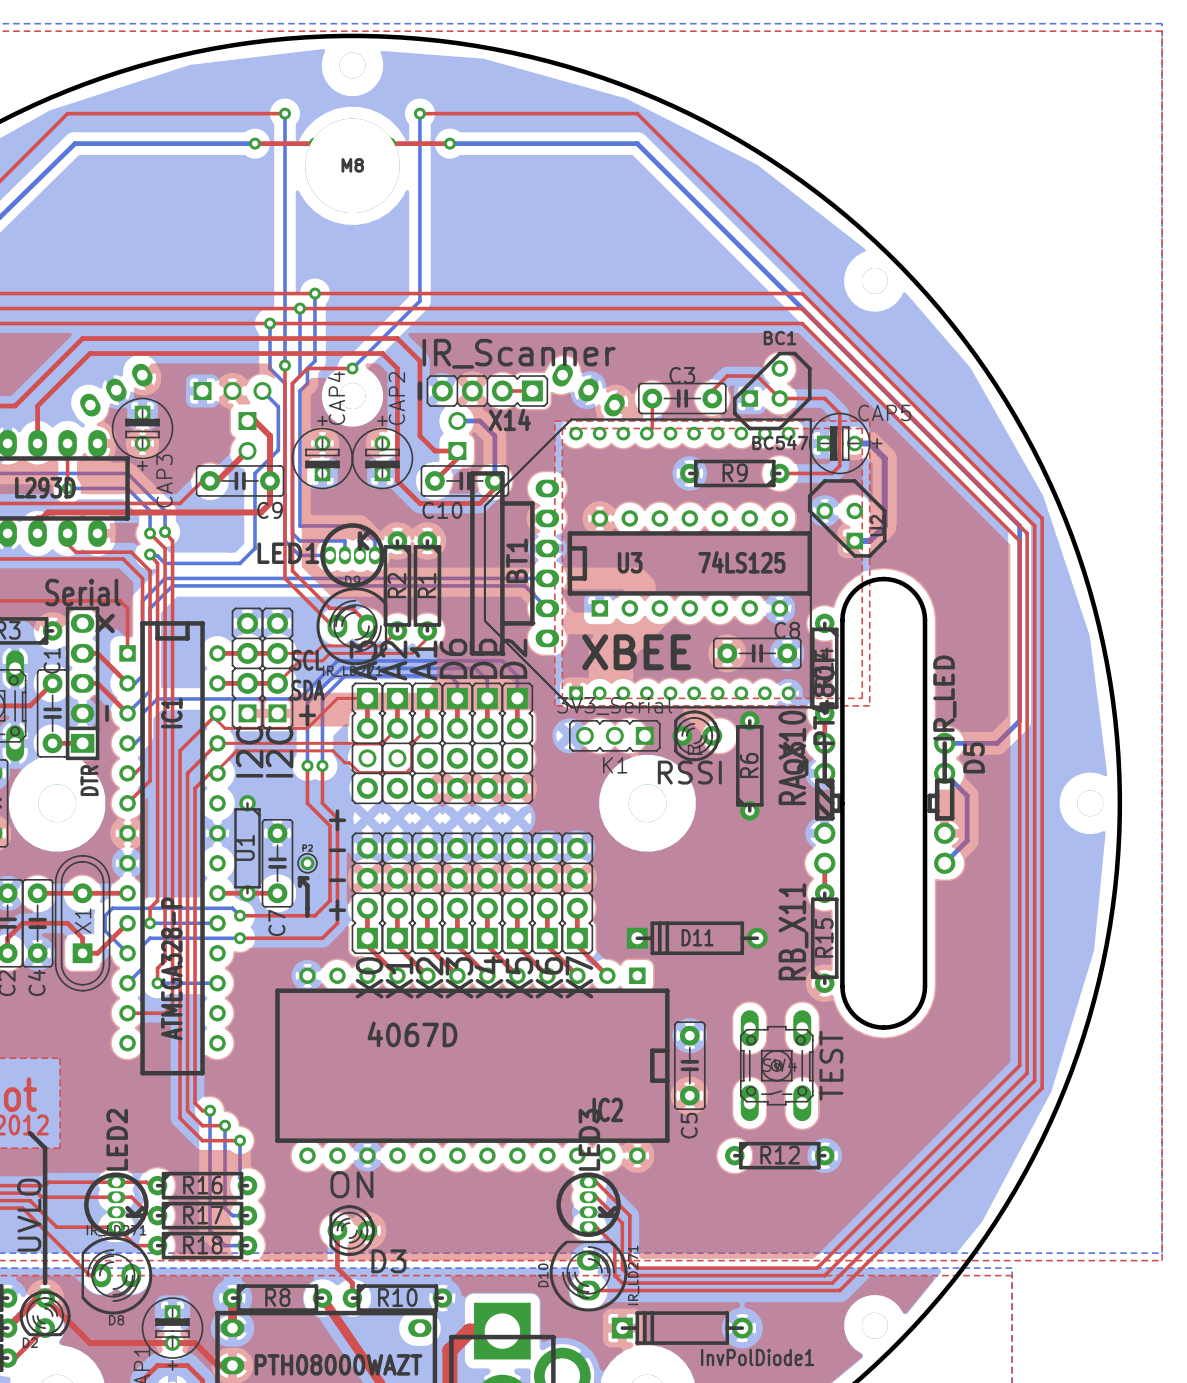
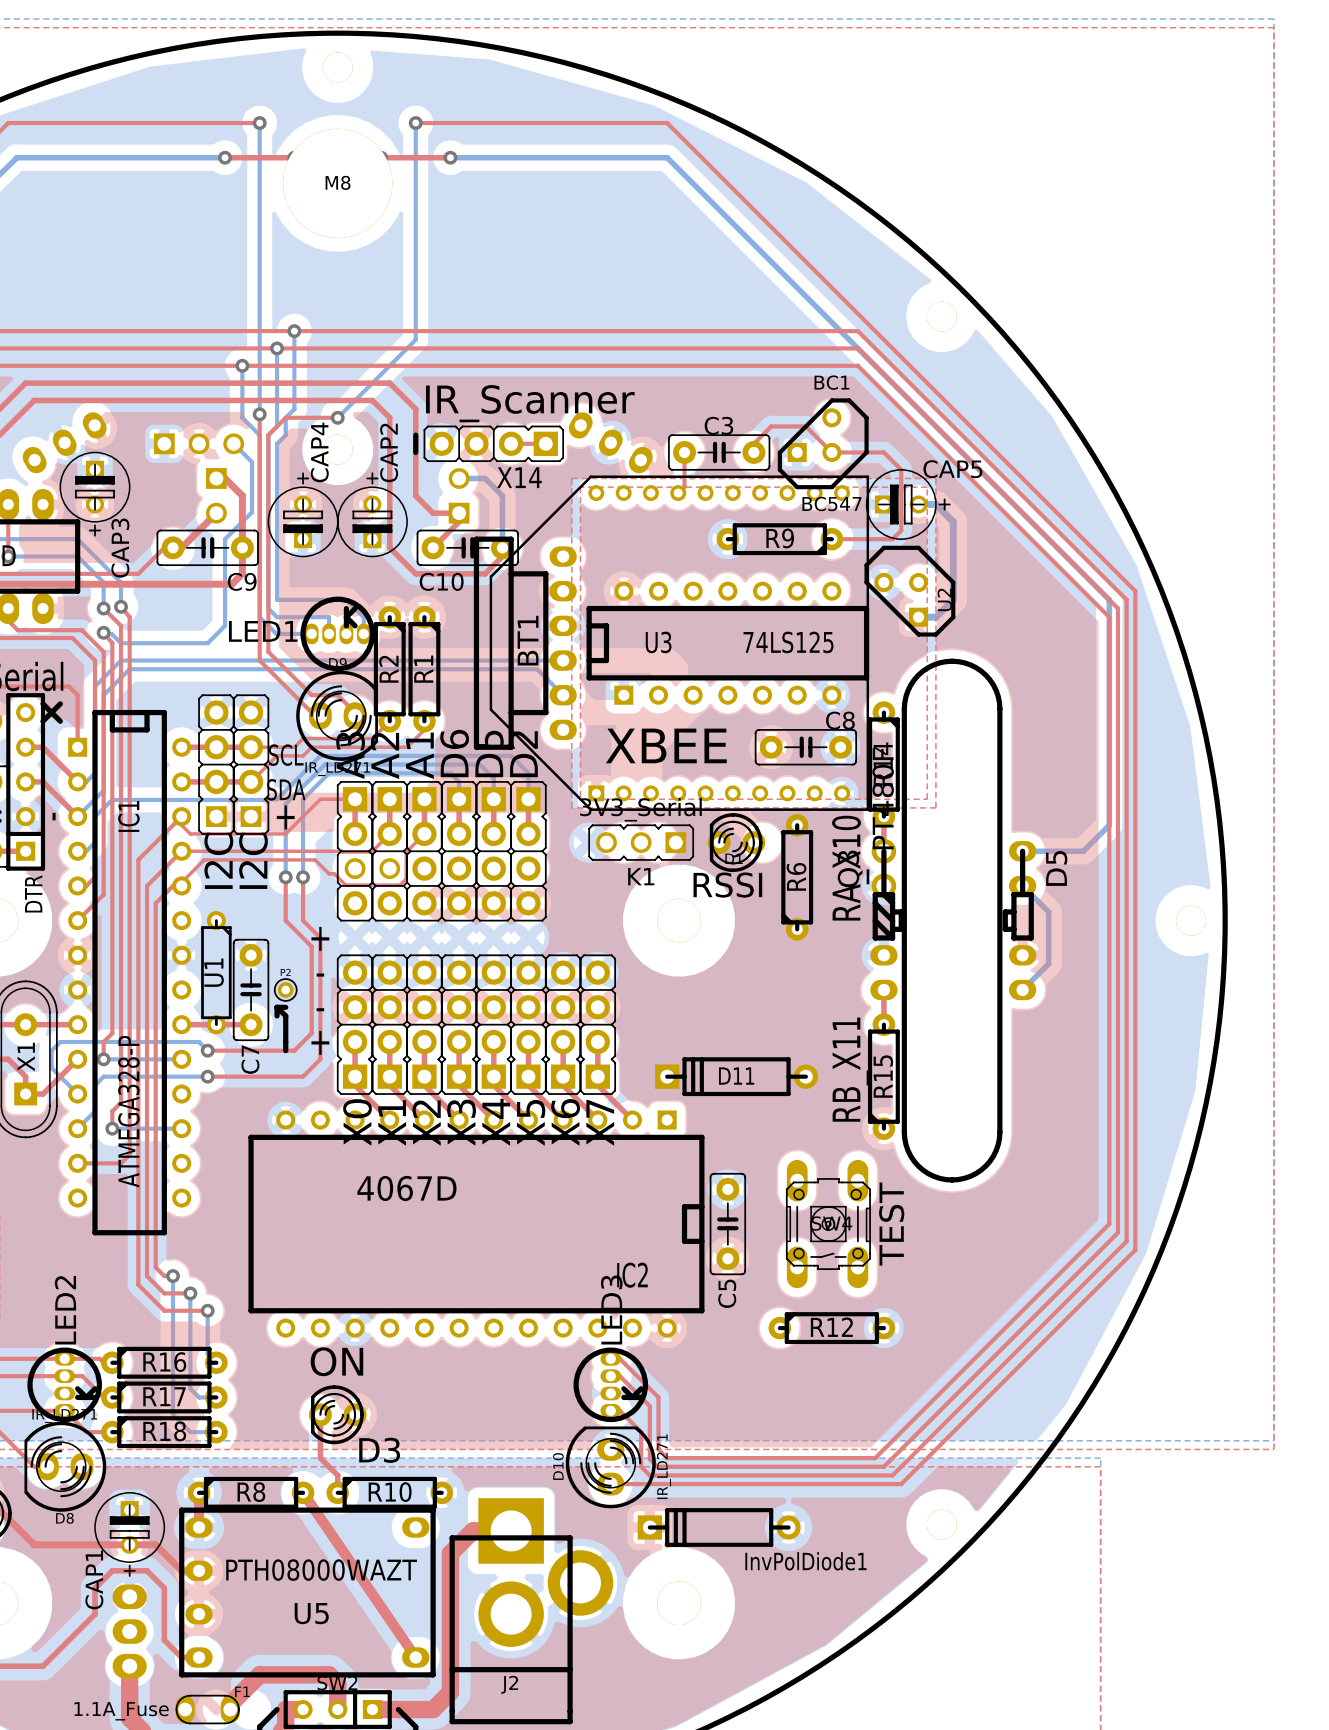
part footprint: [65, 606, 100, 761] -> [6, 693, 46, 871]
D5 value: IR_LED (944, 697) -> none
D5 footprint: [927, 732, 956, 821] -> [1002, 841, 1037, 941]
part footprint: [814, 822, 836, 874] -> [870, 945, 898, 1001]
part footprint: [934, 822, 956, 874] -> [1008, 945, 1037, 1001]

